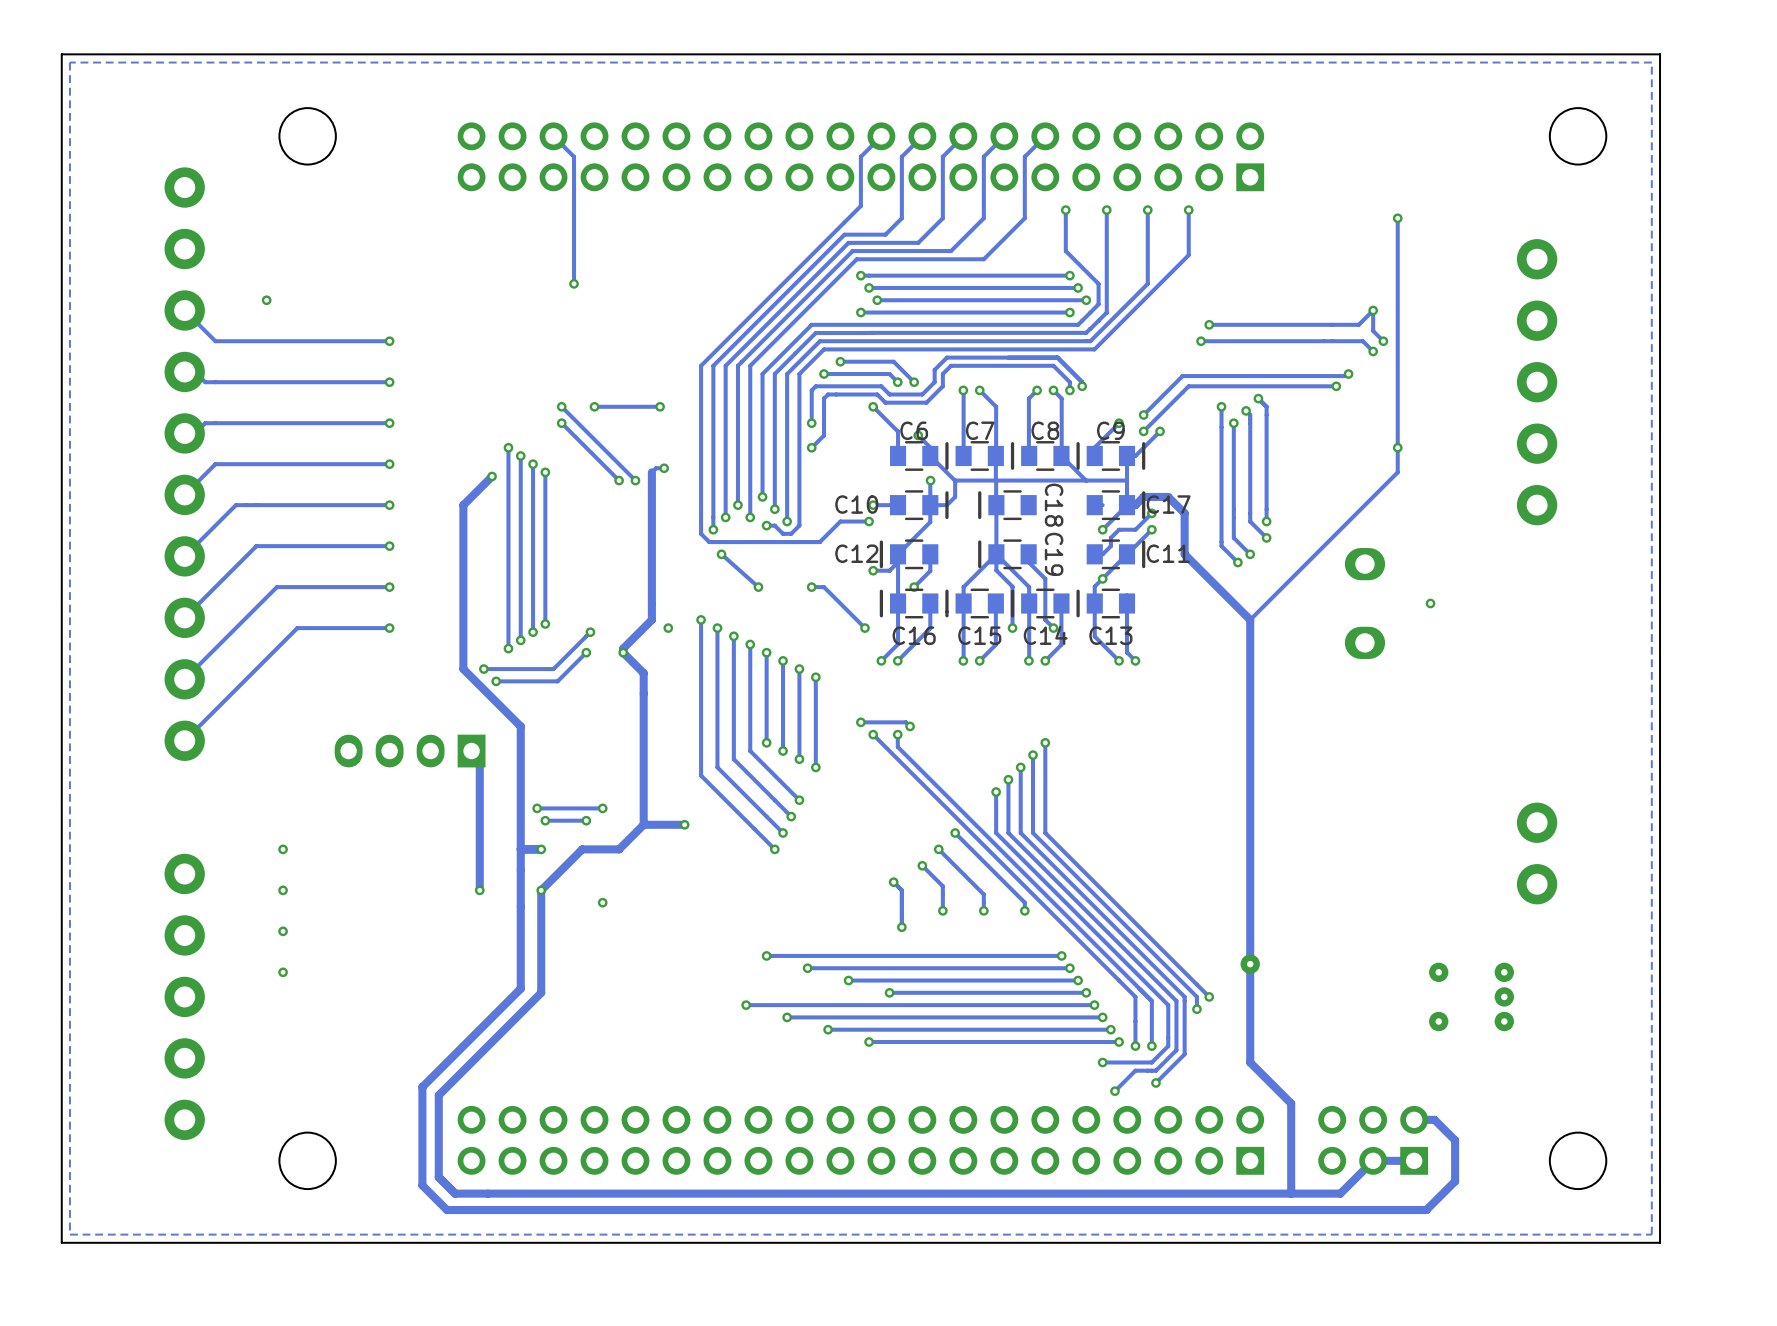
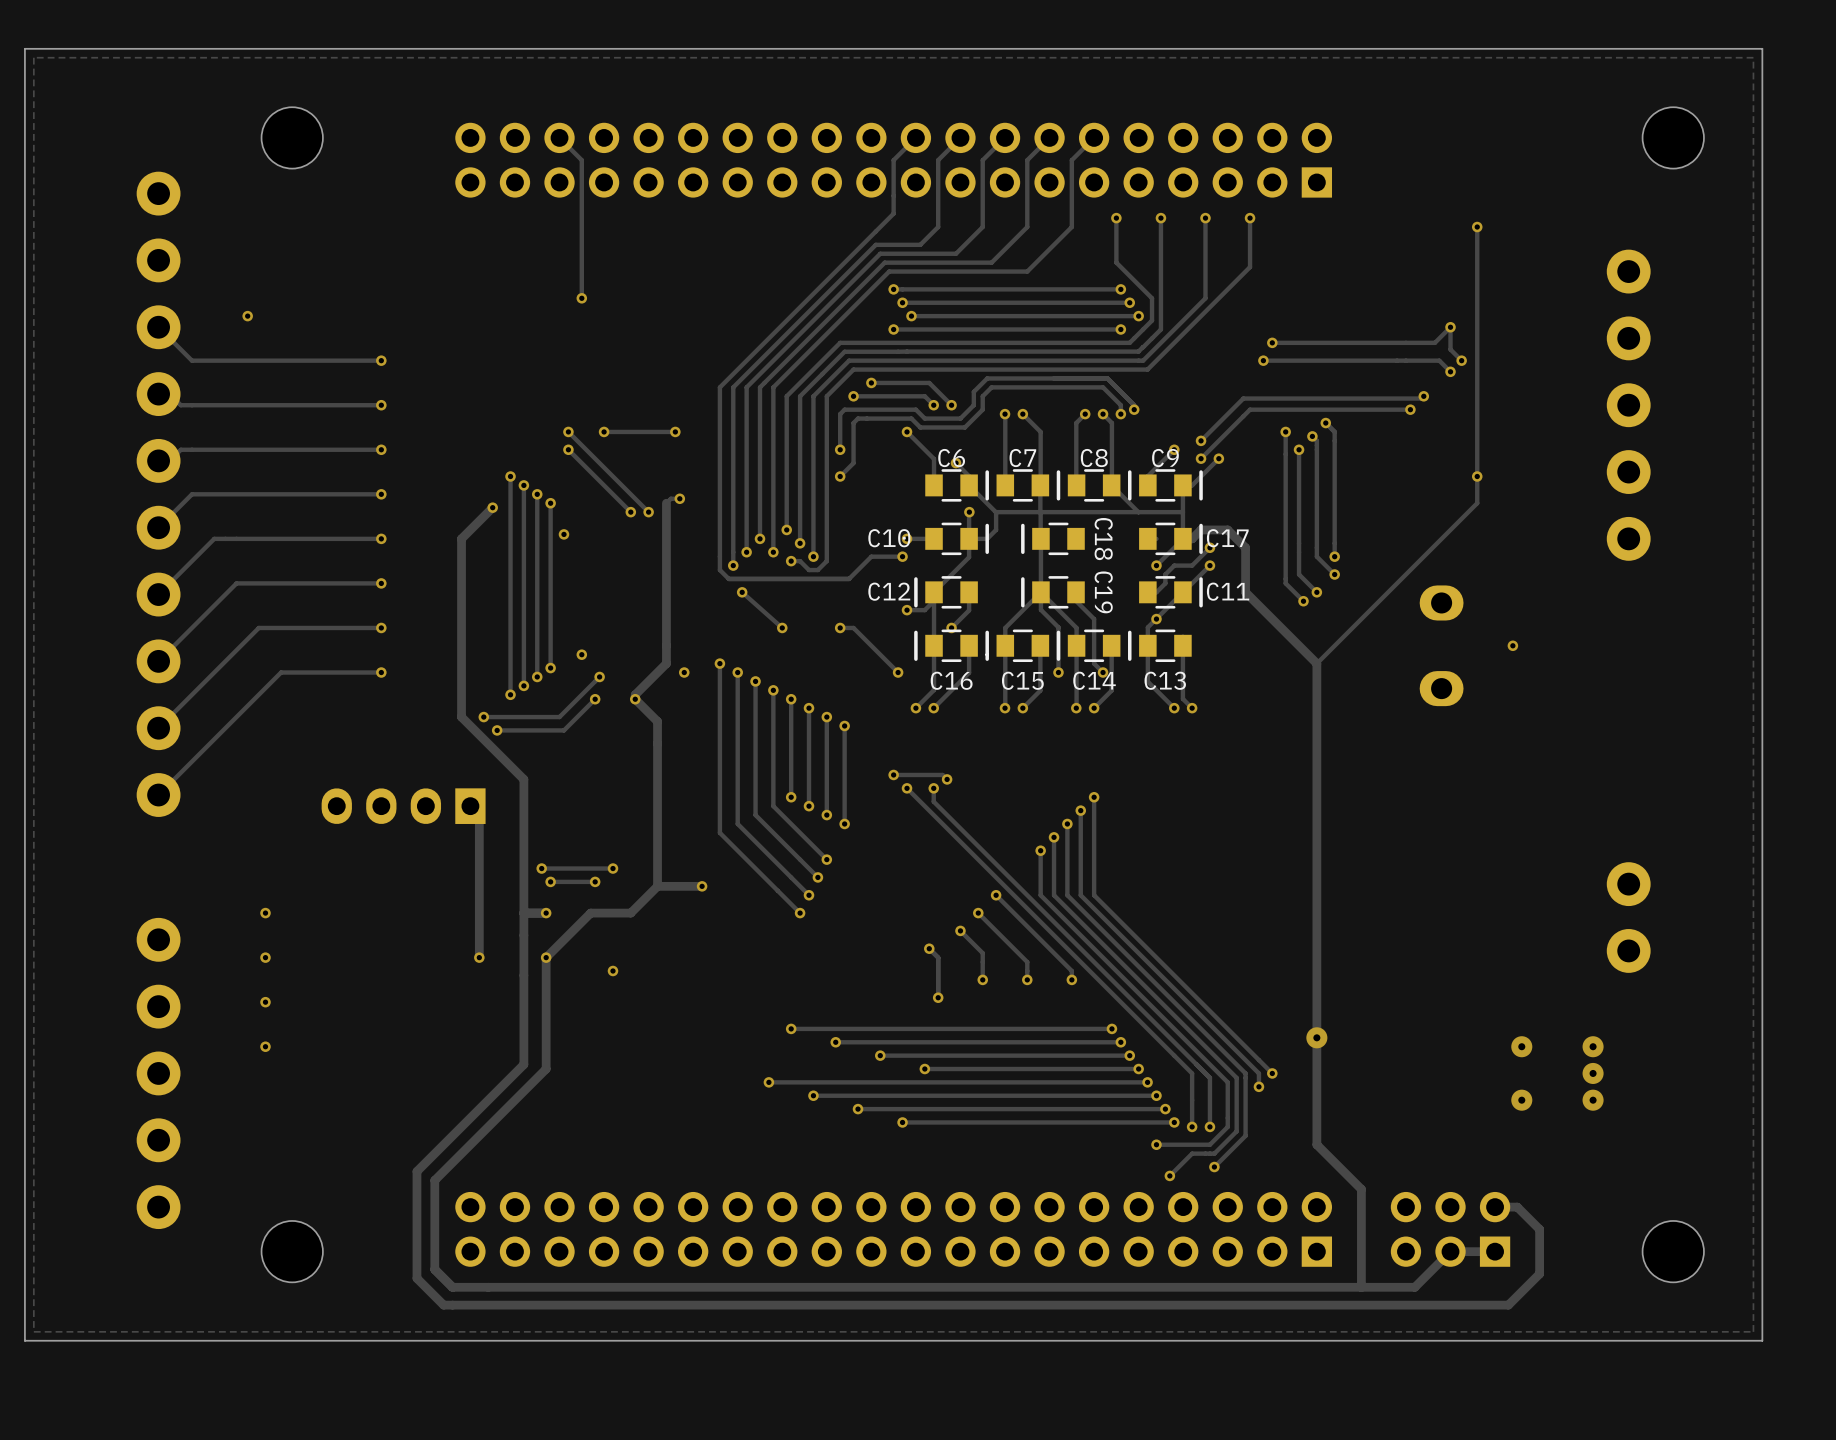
via: none -> (563, 534)
via: none -> (581, 654)

